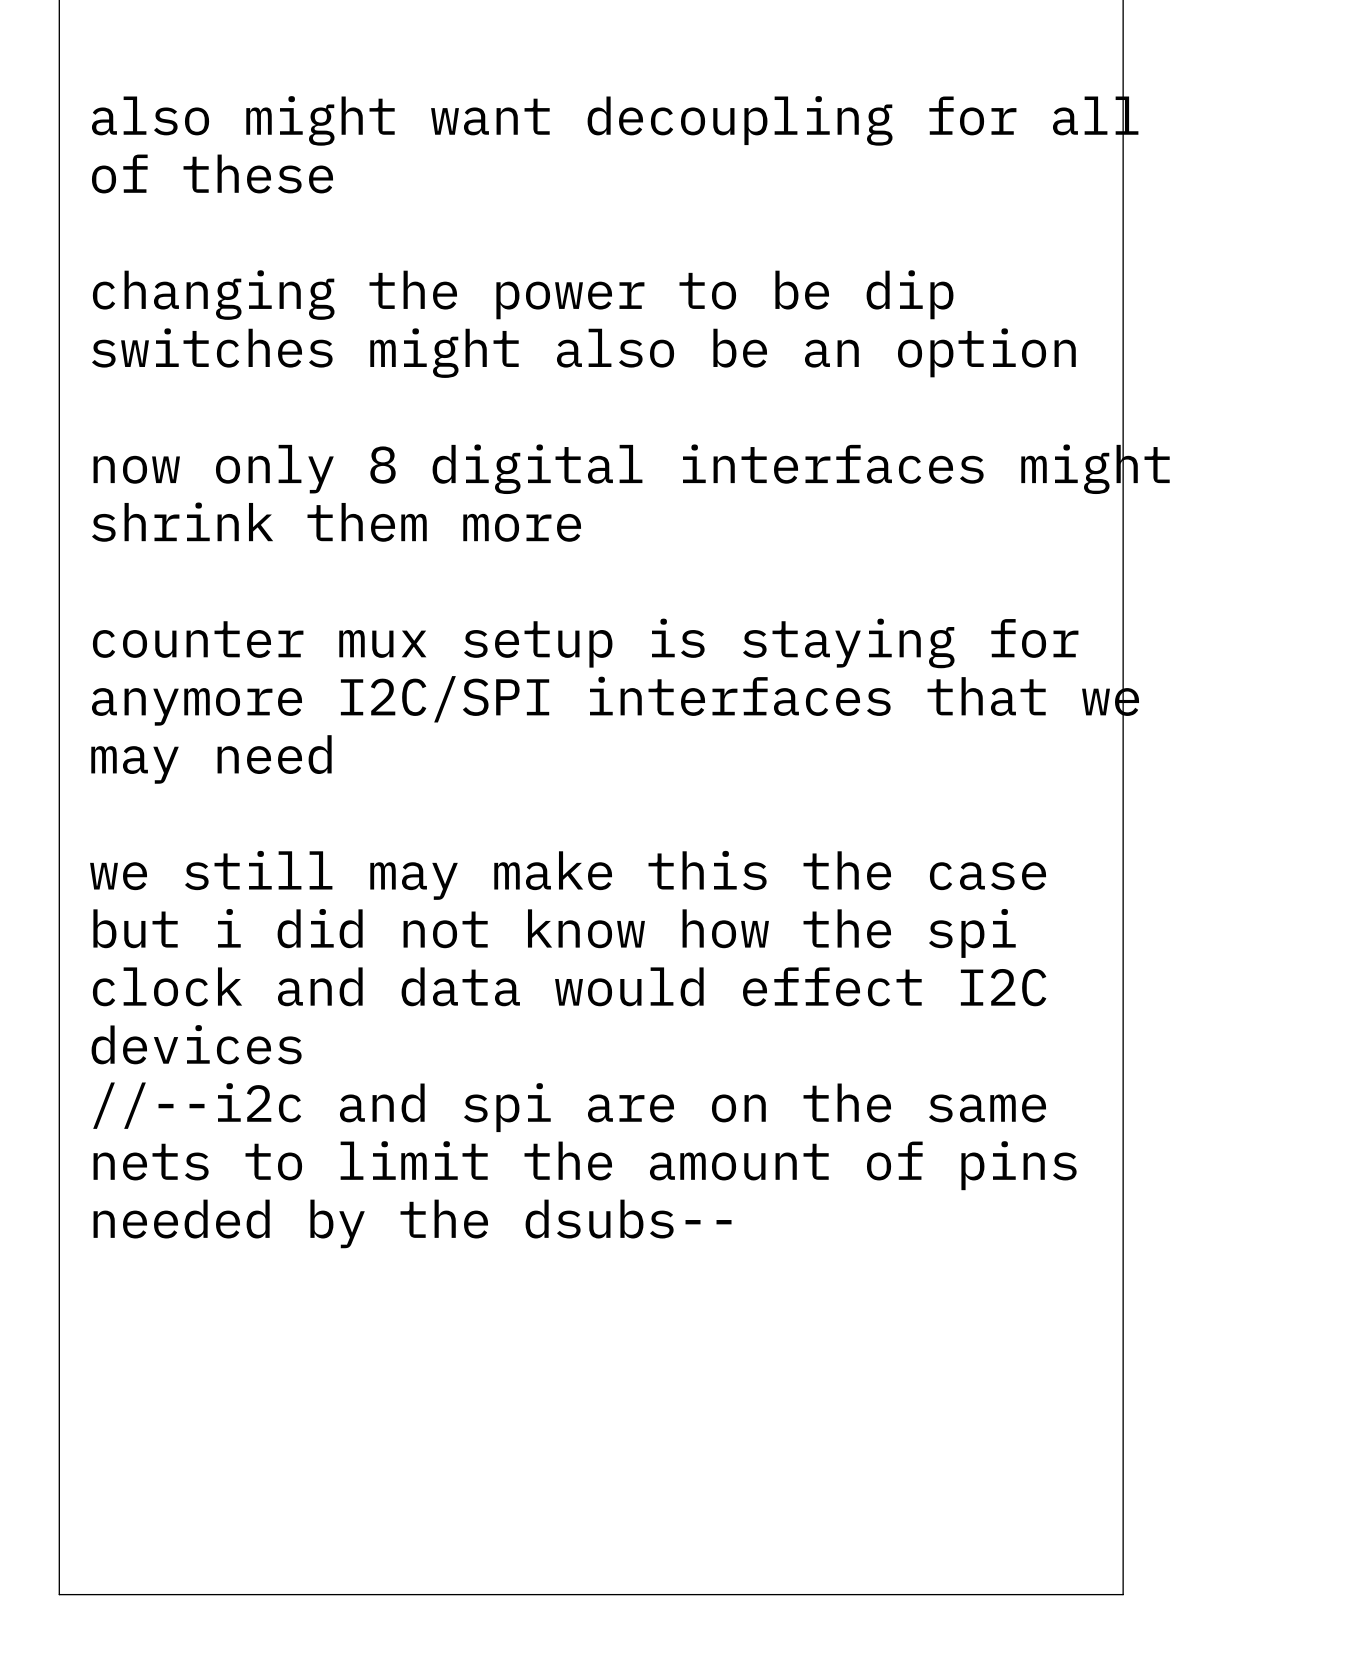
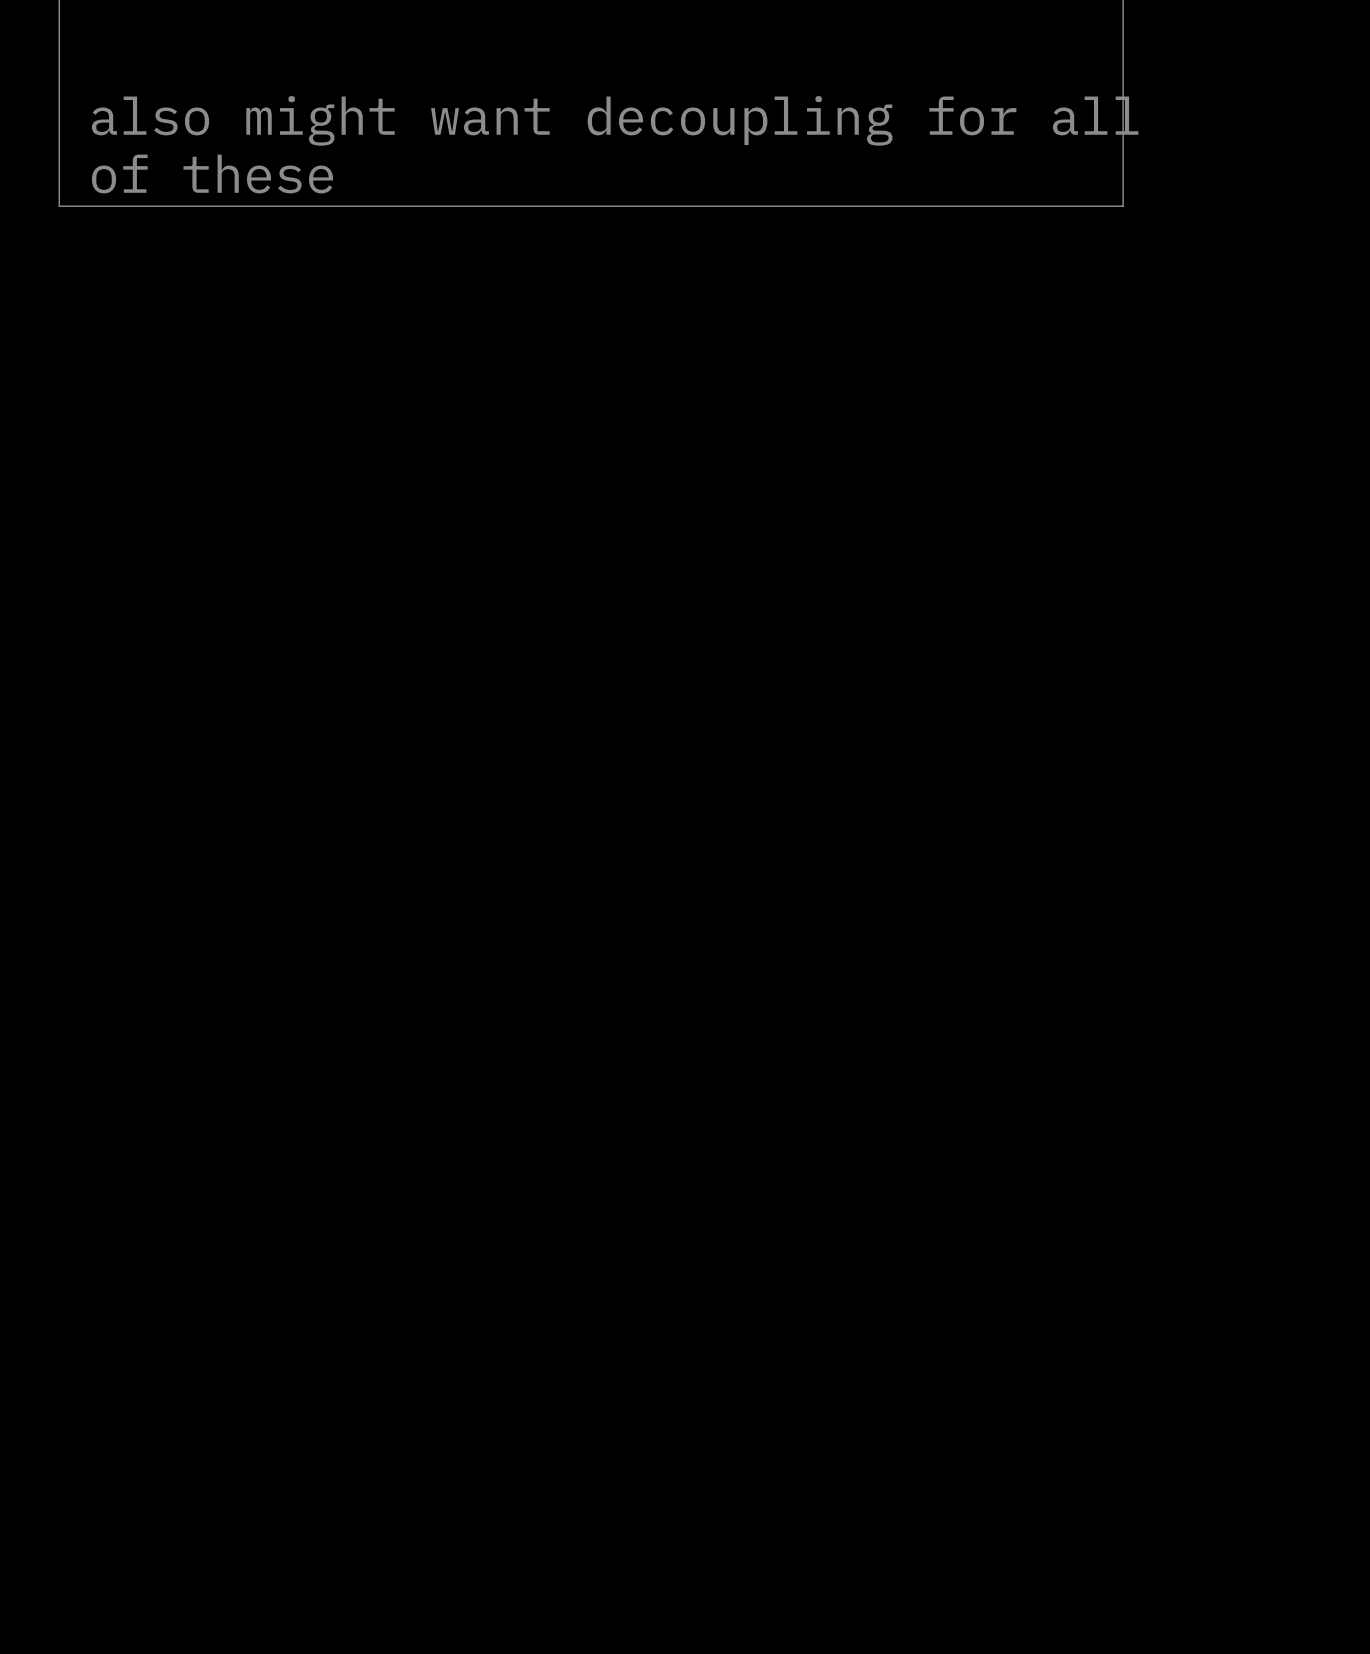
line: (59, 206) (59, 1594) (1123, 1594) (1123, 206) -> (59, 206) (1123, 206)
text: changing the power to be dip (523, 295) -> none
text: switches might also be an option (583, 353) -> none
text: now only 8 digital interfaces might (631, 469) -> none
text: shrink them more (336, 522) -> none
text: counter mux setup is staying for (585, 643) -> none
text: anymore I2C/SPI interfaces that we (615, 700) -> none
text: may need (211, 759) -> none
text: we still may make this the case (568, 875) -> none
text: but i did not know how the spi (554, 933) -> none
text: clock and data would effect I2C (569, 986) -> none
text: devices (196, 1044) -> none
text: //--i2c and spi are on the same (569, 1107) -> none
text: nets to limit the amount of pins (585, 1165) -> none
text: needed by the dsubs-- (412, 1223) -> none

